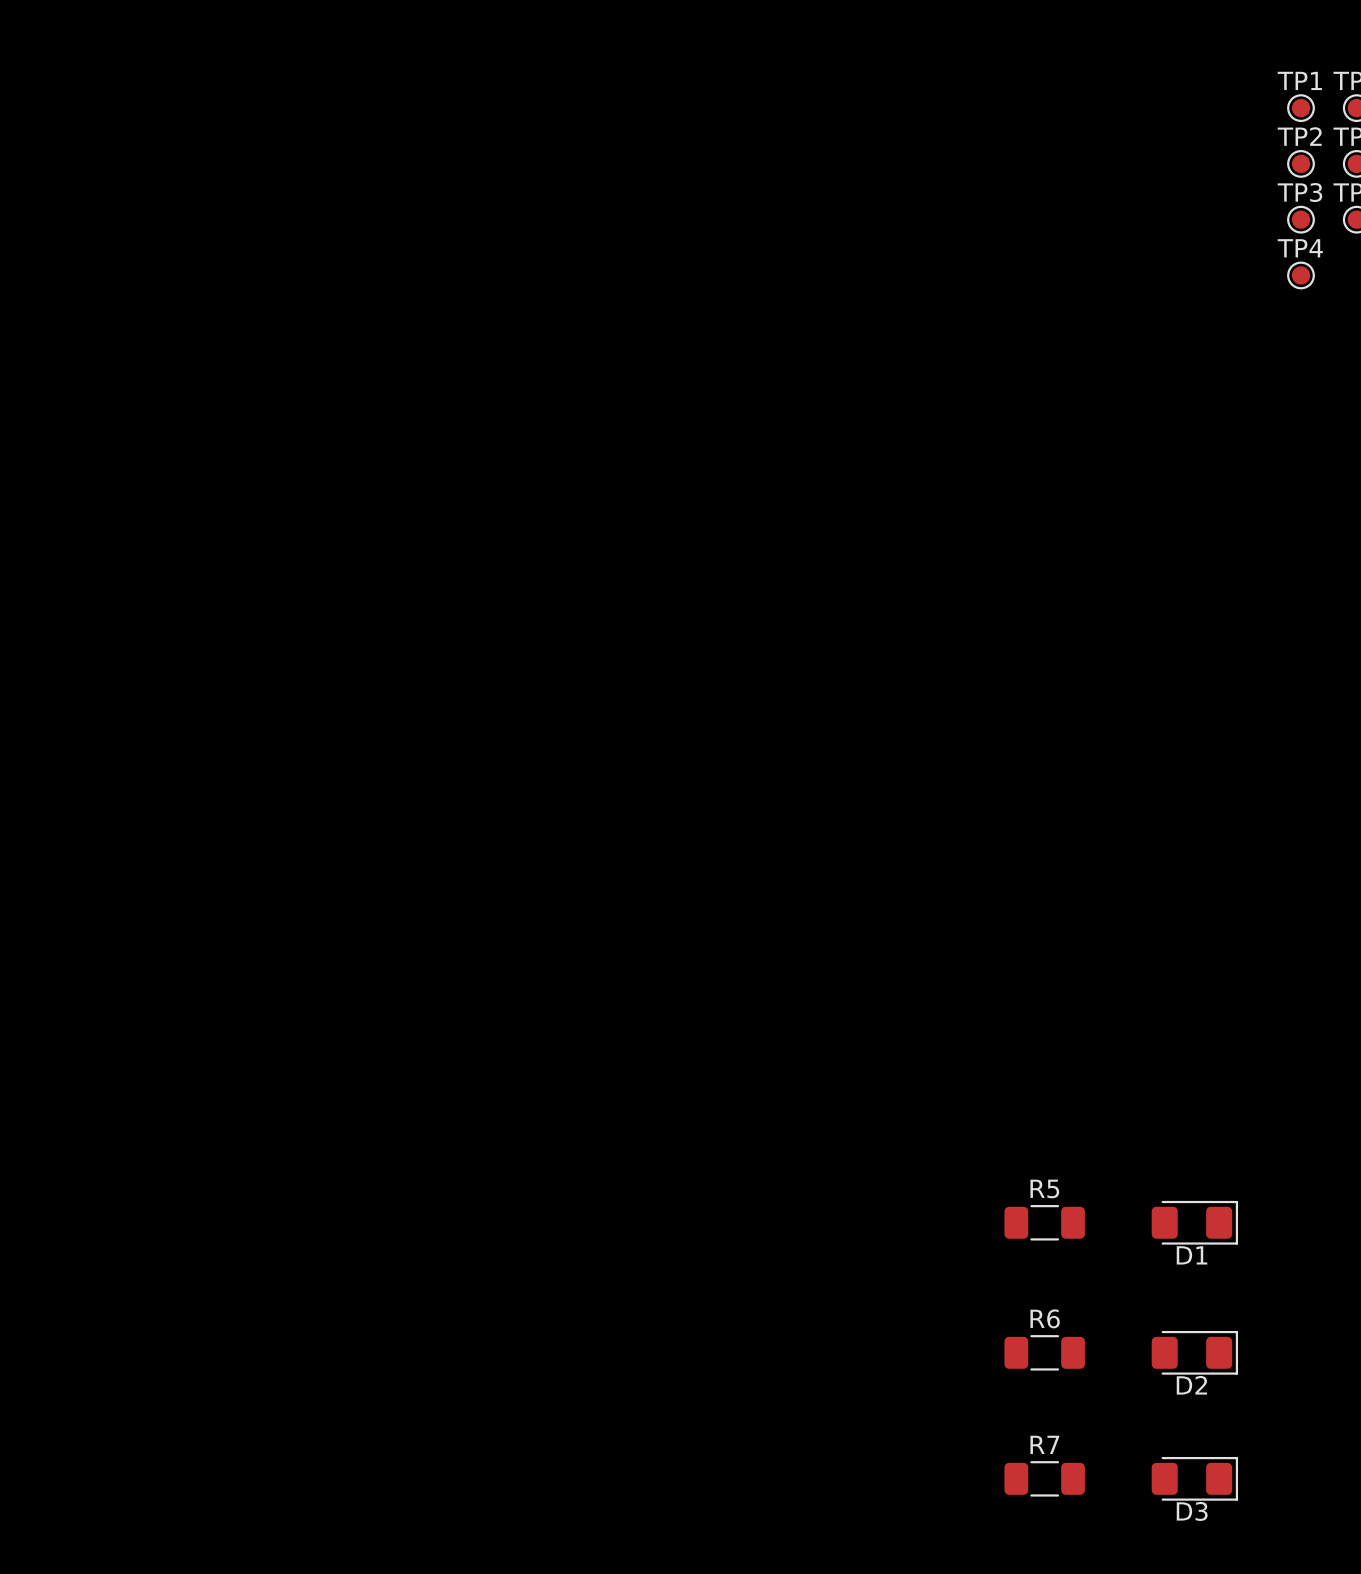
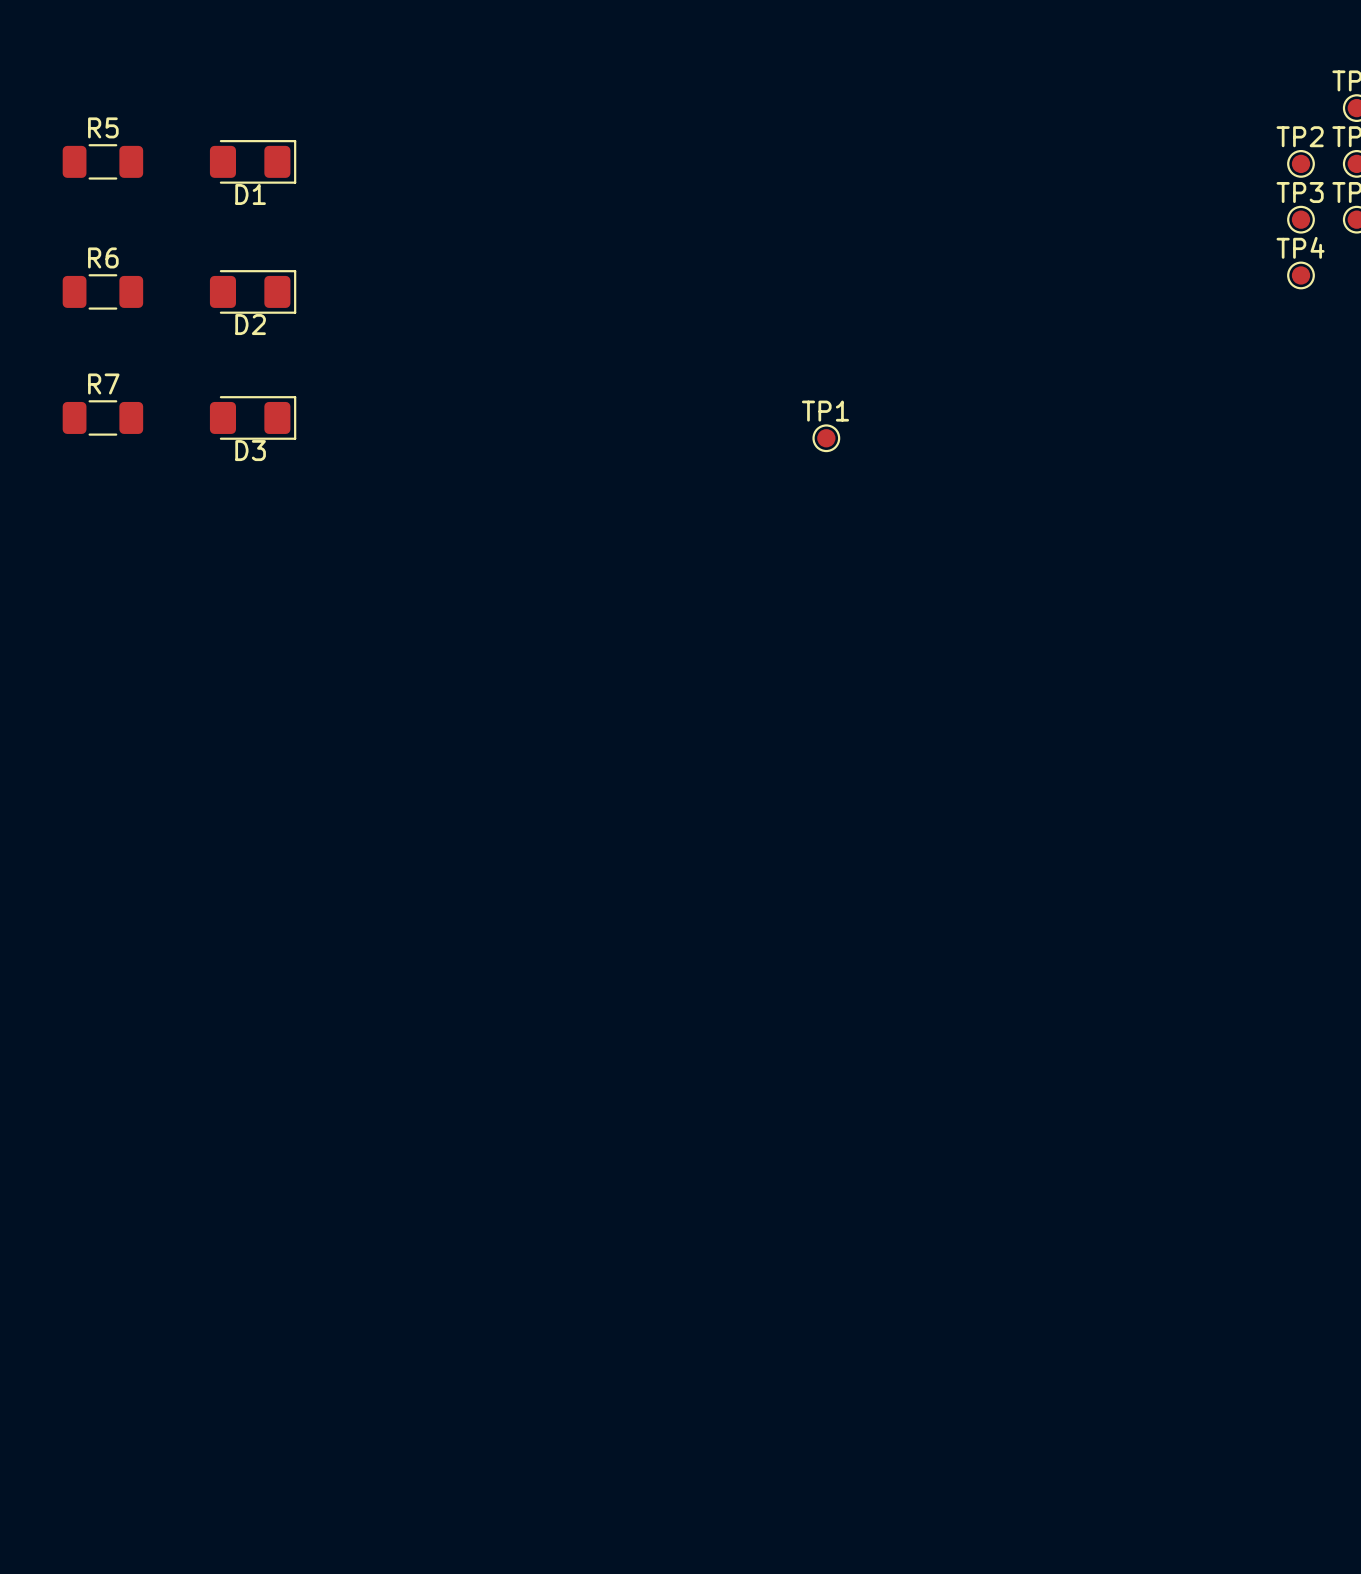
TP1 position: (1301, 108) -> (826, 438)
R5 position: (1044, 1222) -> (102, 161)
D1 position: (1194, 1222) -> (253, 161)
R6 position: (1044, 1352) -> (102, 291)
D2 position: (1194, 1352) -> (253, 291)
R7 position: (1044, 1478) -> (102, 417)
D3 position: (1194, 1478) -> (253, 417)

